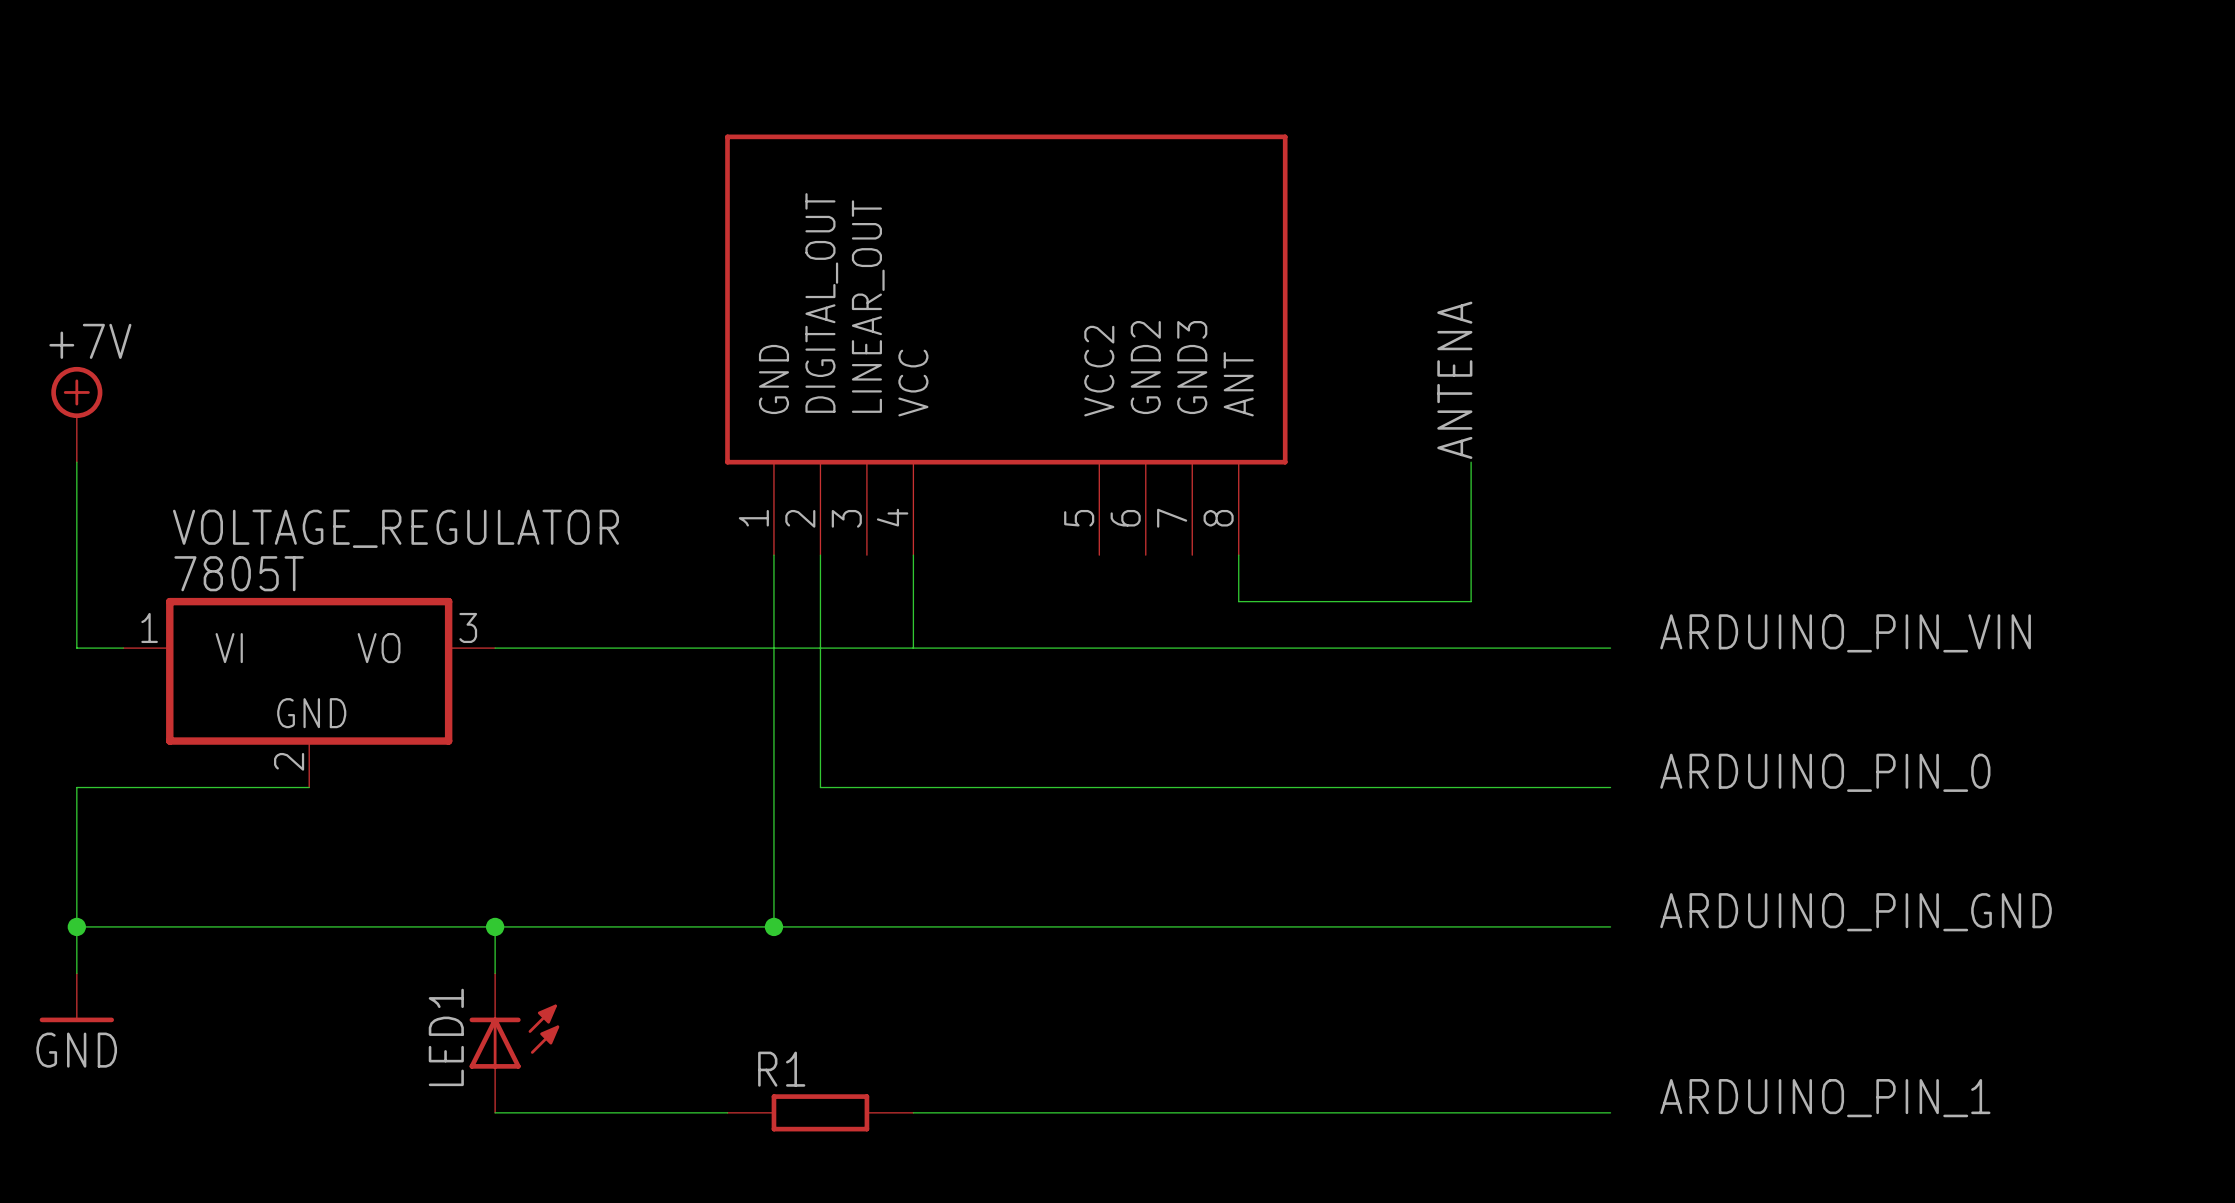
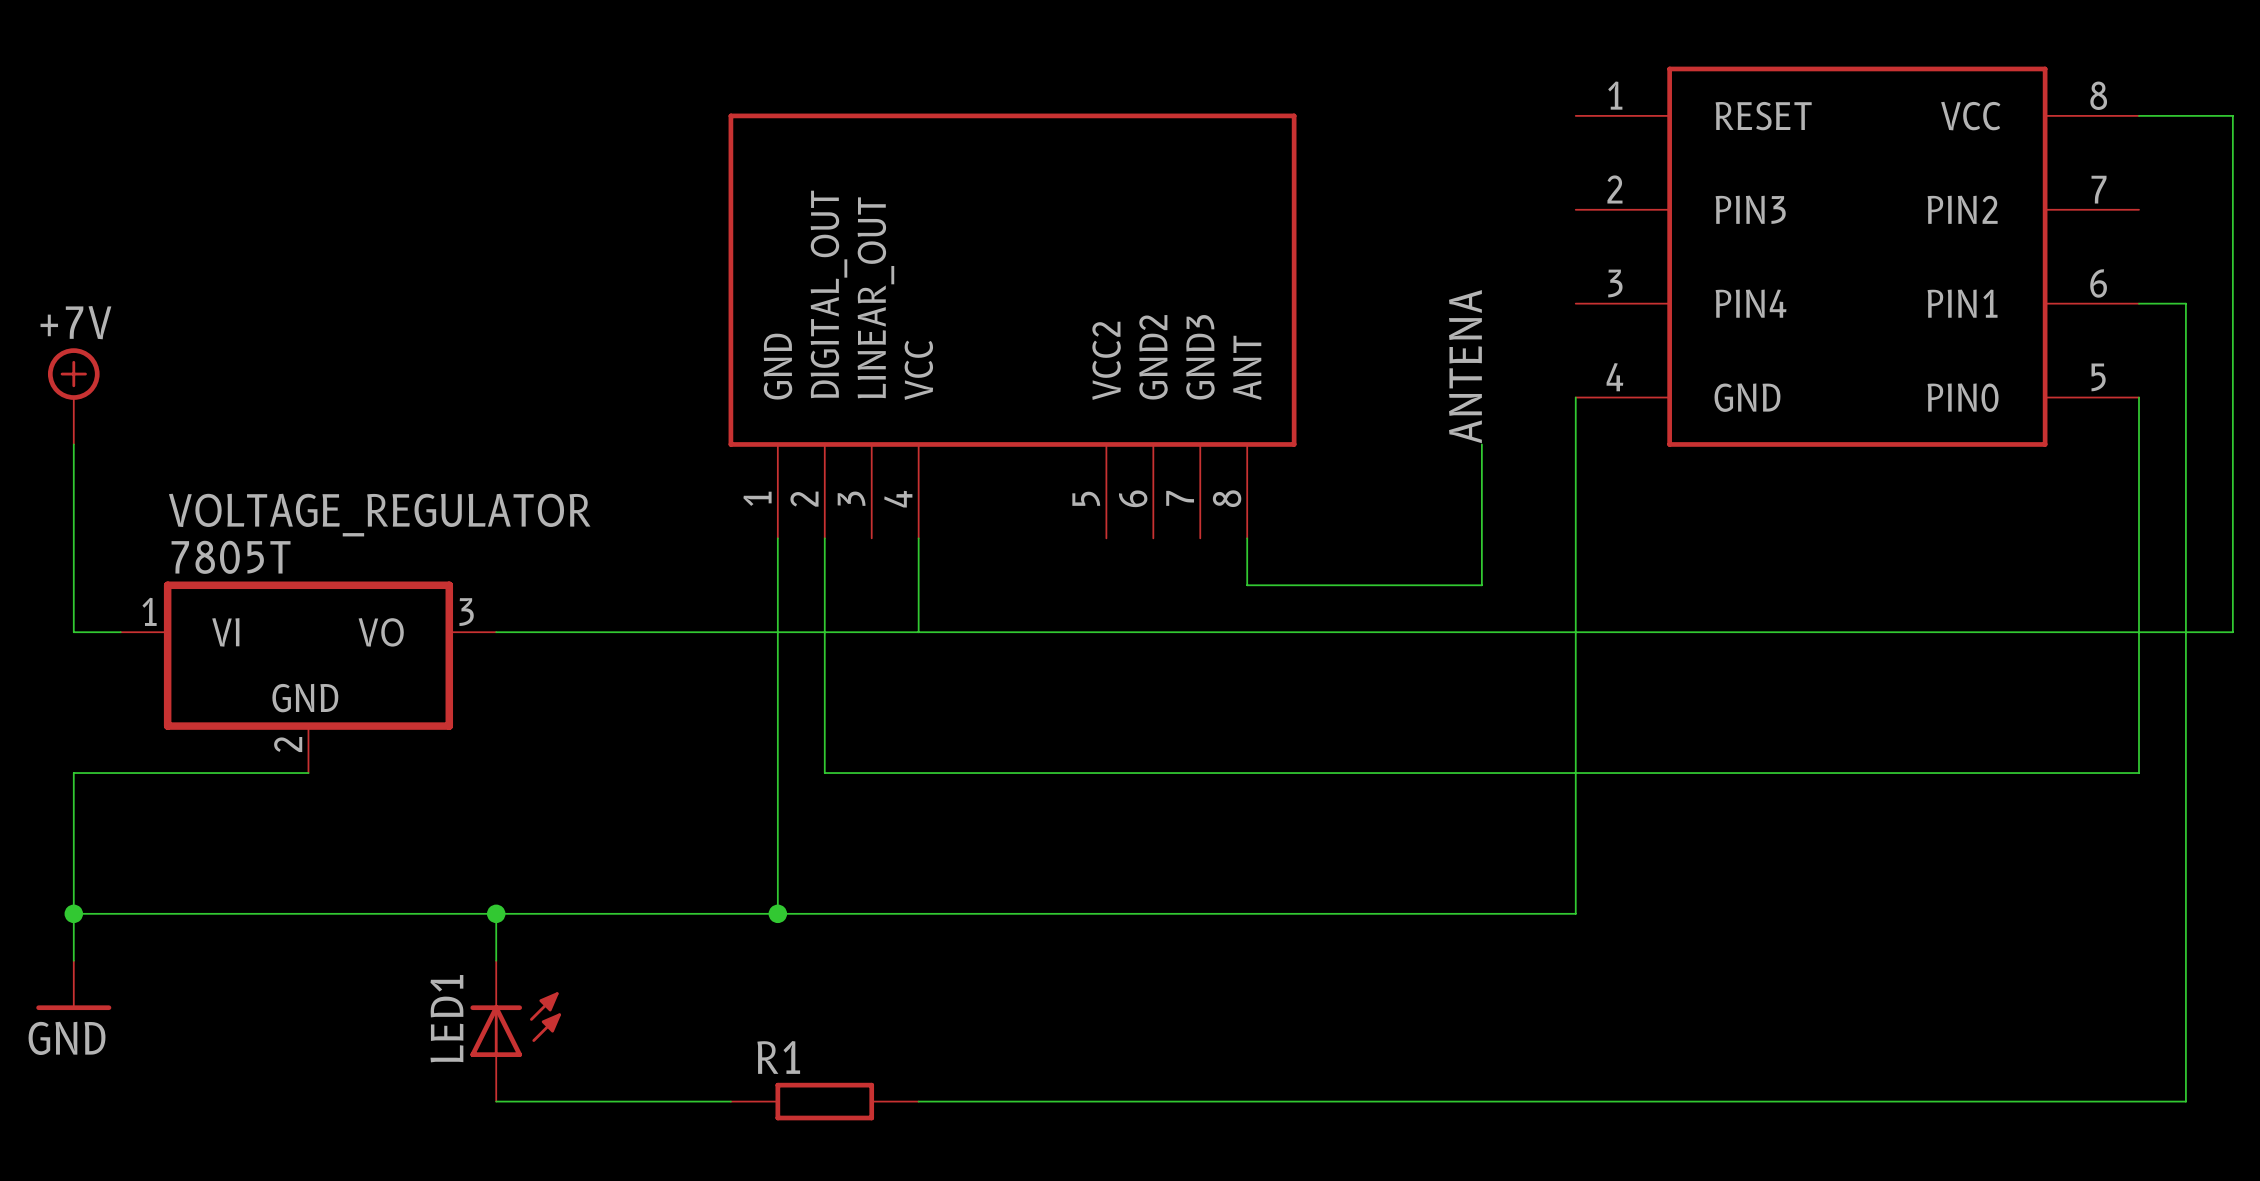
wire: none -> (2139, 115) (2232, 115) (2232, 632) (1622, 632)
part: none -> (1857, 256)
wire: none -> (2139, 303) (2185, 303) (2185, 1101) (1622, 1101)
wire: none -> (2139, 397) (2139, 773) (1622, 773)
label: ARDUINO_PIN_VIN (1845, 633) -> none
label: ARDUINO_PIN_0 (1825, 772) -> none
label: ARDUINO_PIN_GND (1856, 912) -> none
wire: (1564, 926) (1610, 926) -> (1575, 913) (1575, 397)
label: ARDUINO_PIN_1 (1825, 1098) -> none

